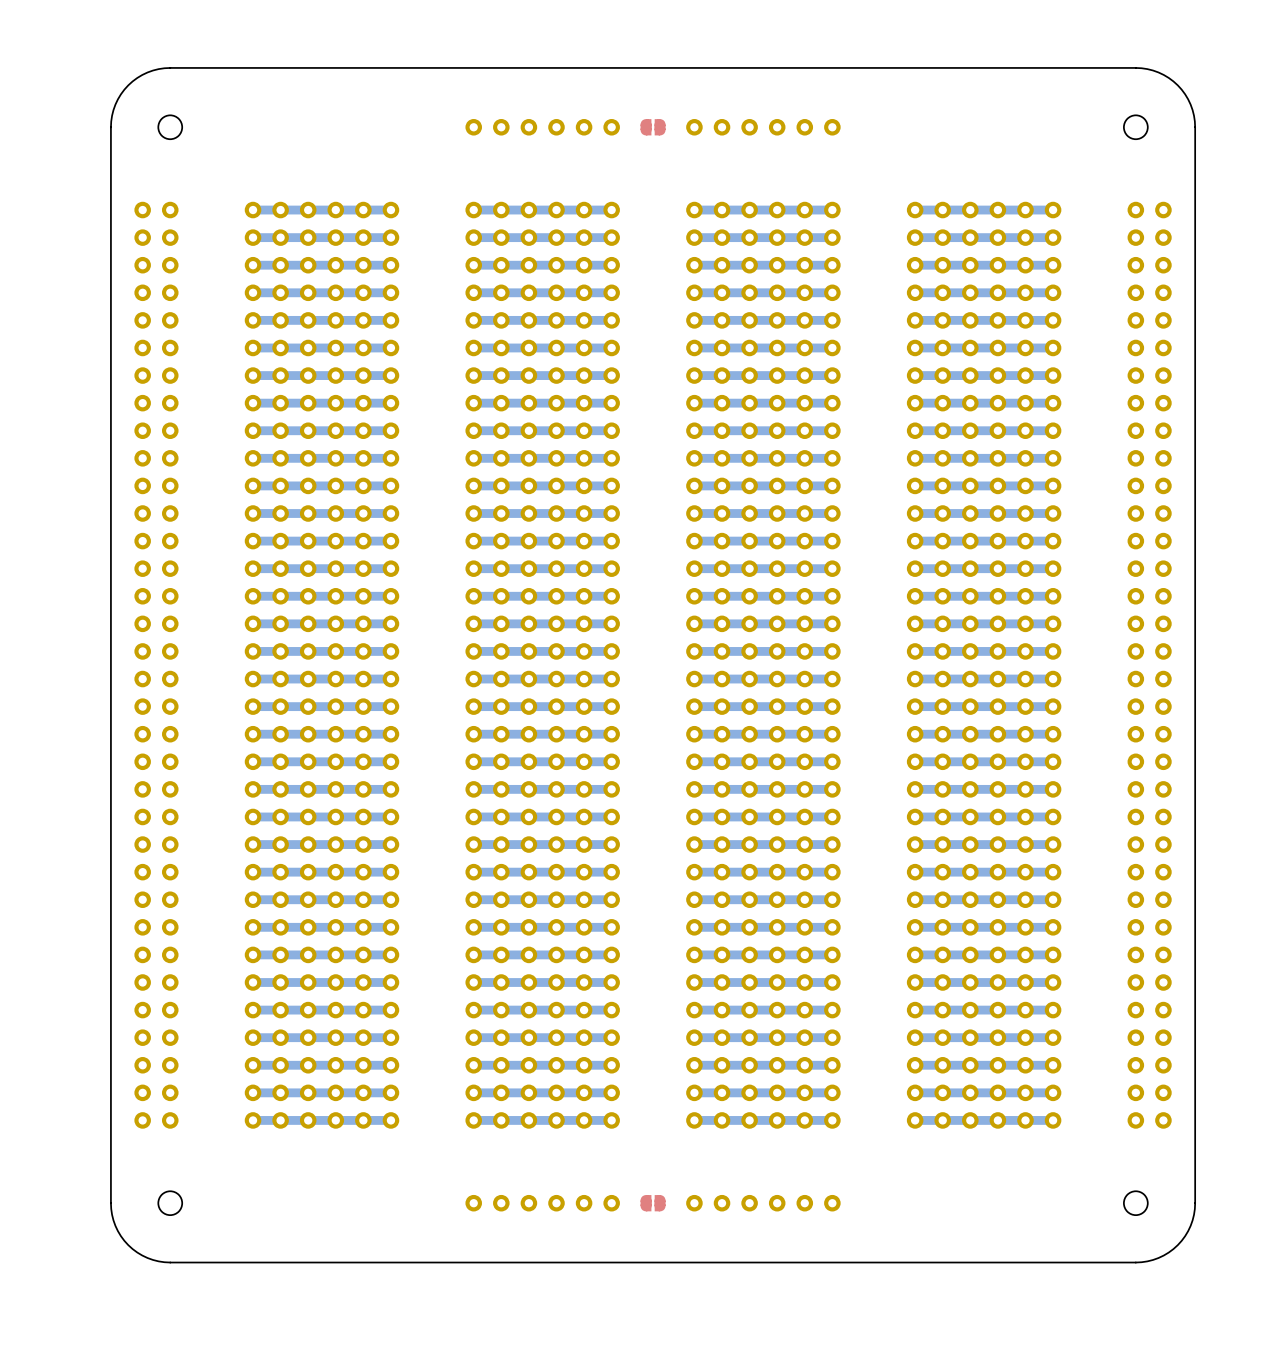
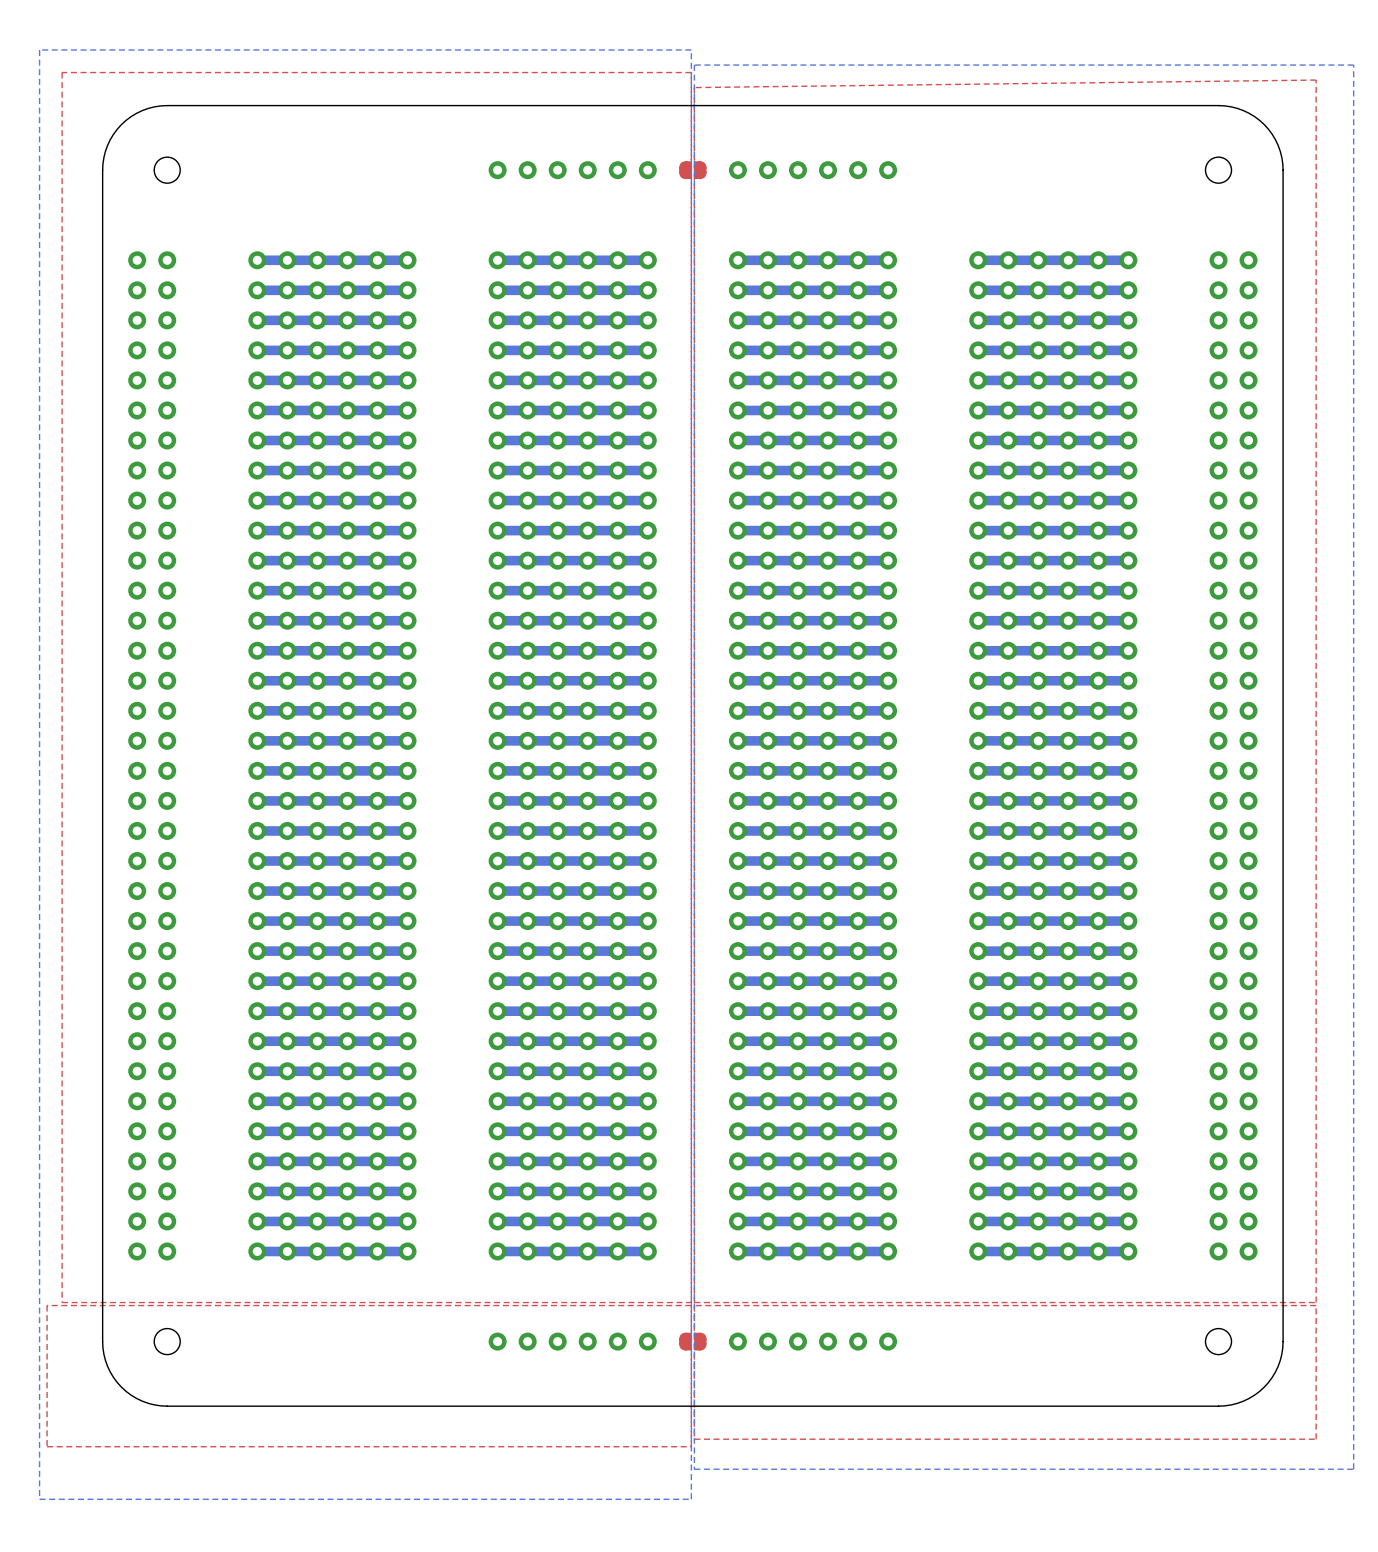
bottom zone outline: none -> (691, 50) (691, 1499) (39, 1499) (39, 50) (691, 50)
bottom zone outline: none -> (1353, 65) (1353, 1469) (694, 1469) (694, 65) (1353, 65)
top zone outline: none -> (691, 72) (691, 1302) (62, 1302) (62, 72) (691, 72)
top zone outline: none -> (1316, 80) (1316, 1302) (694, 1302) (694, 87) (1316, 80)
top zone outline: none -> (691, 1305) (691, 1446) (47, 1446) (47, 1305) (691, 1305)
top zone outline: none -> (1316, 1305) (1316, 1439) (694, 1439) (694, 1305) (1316, 1305)

